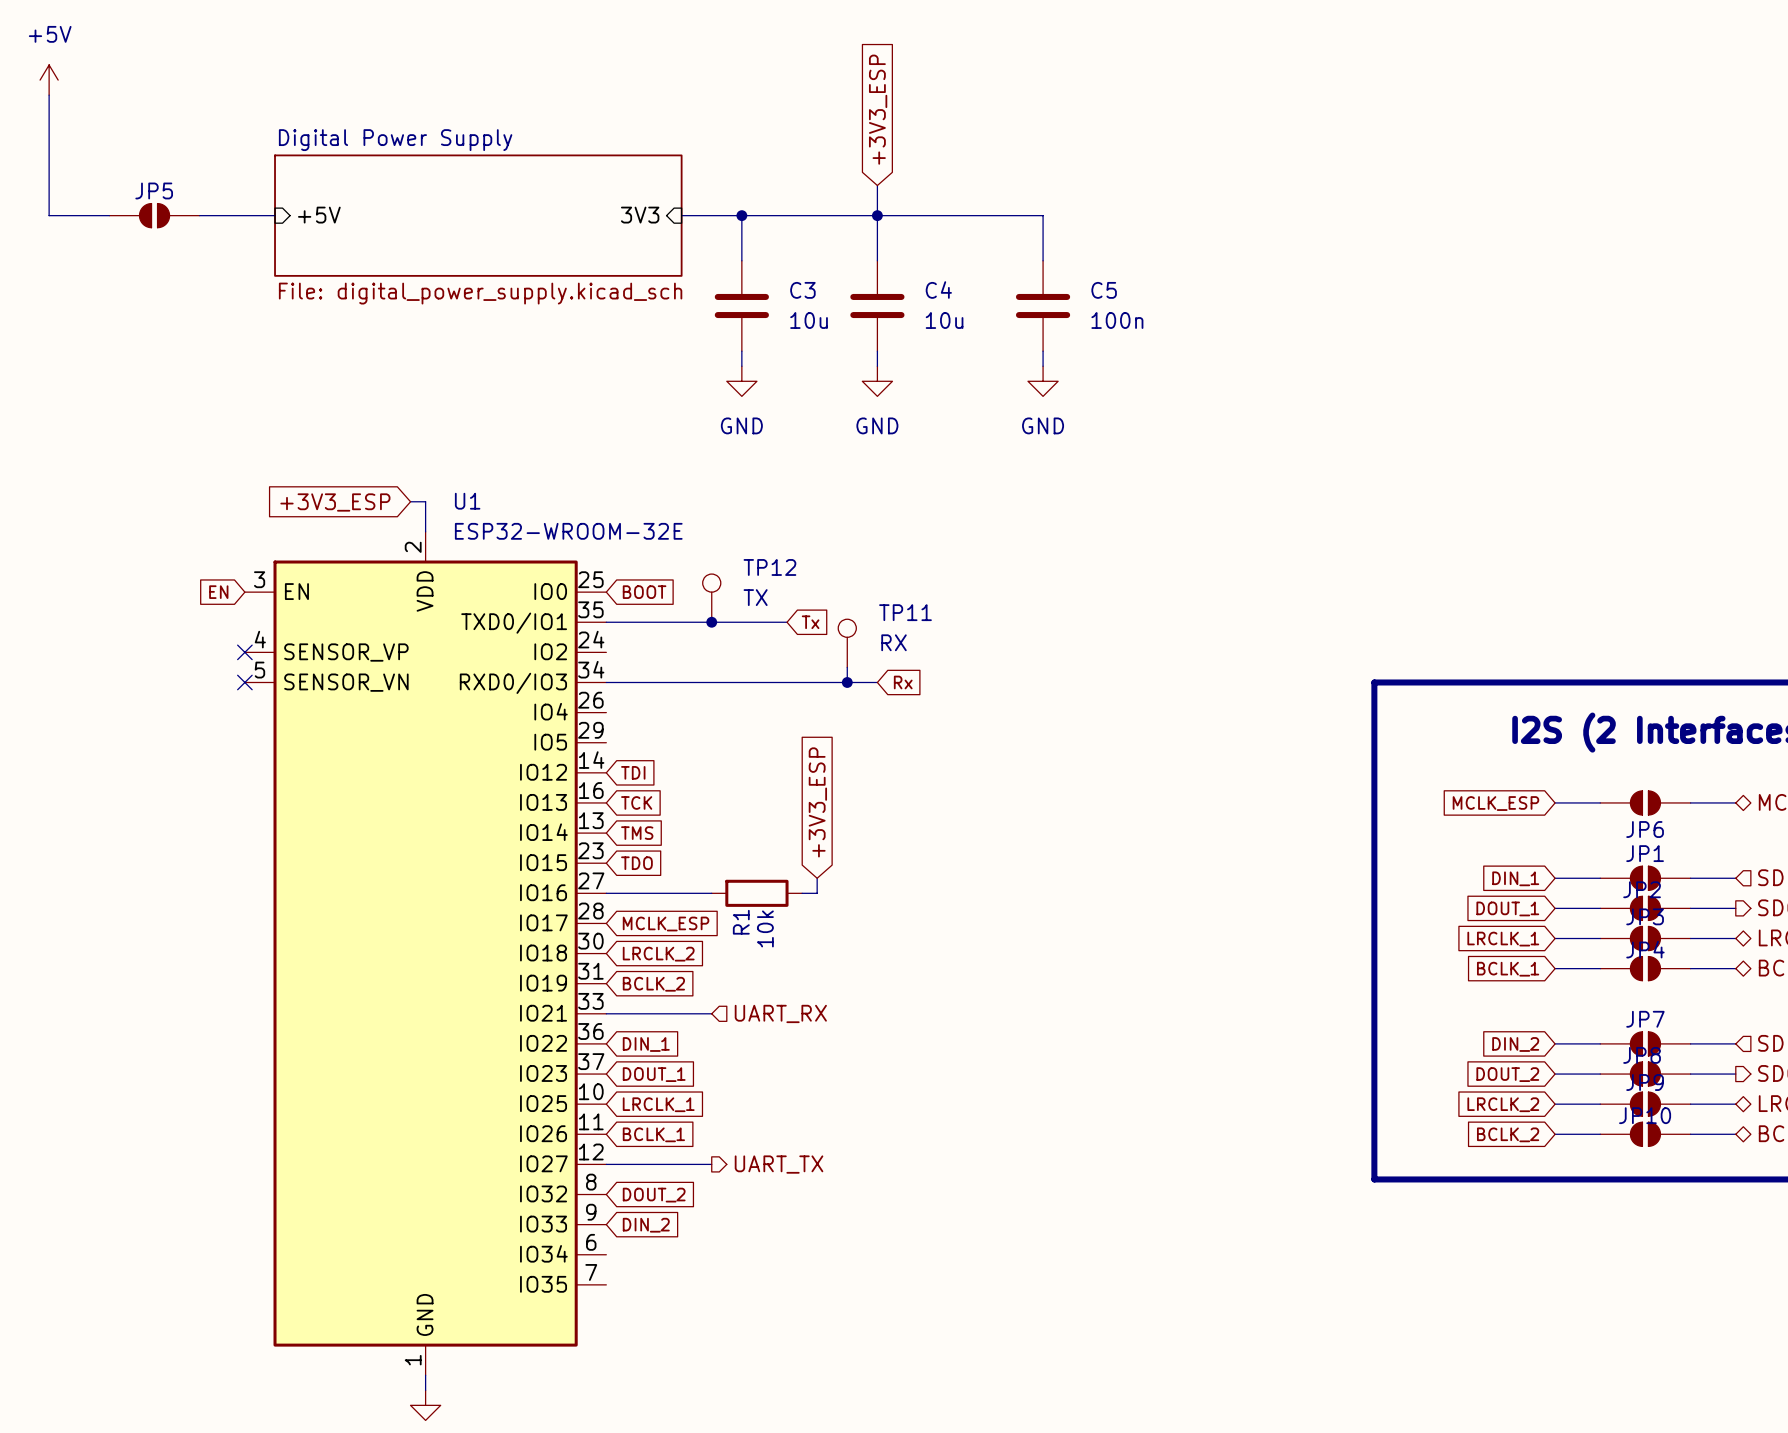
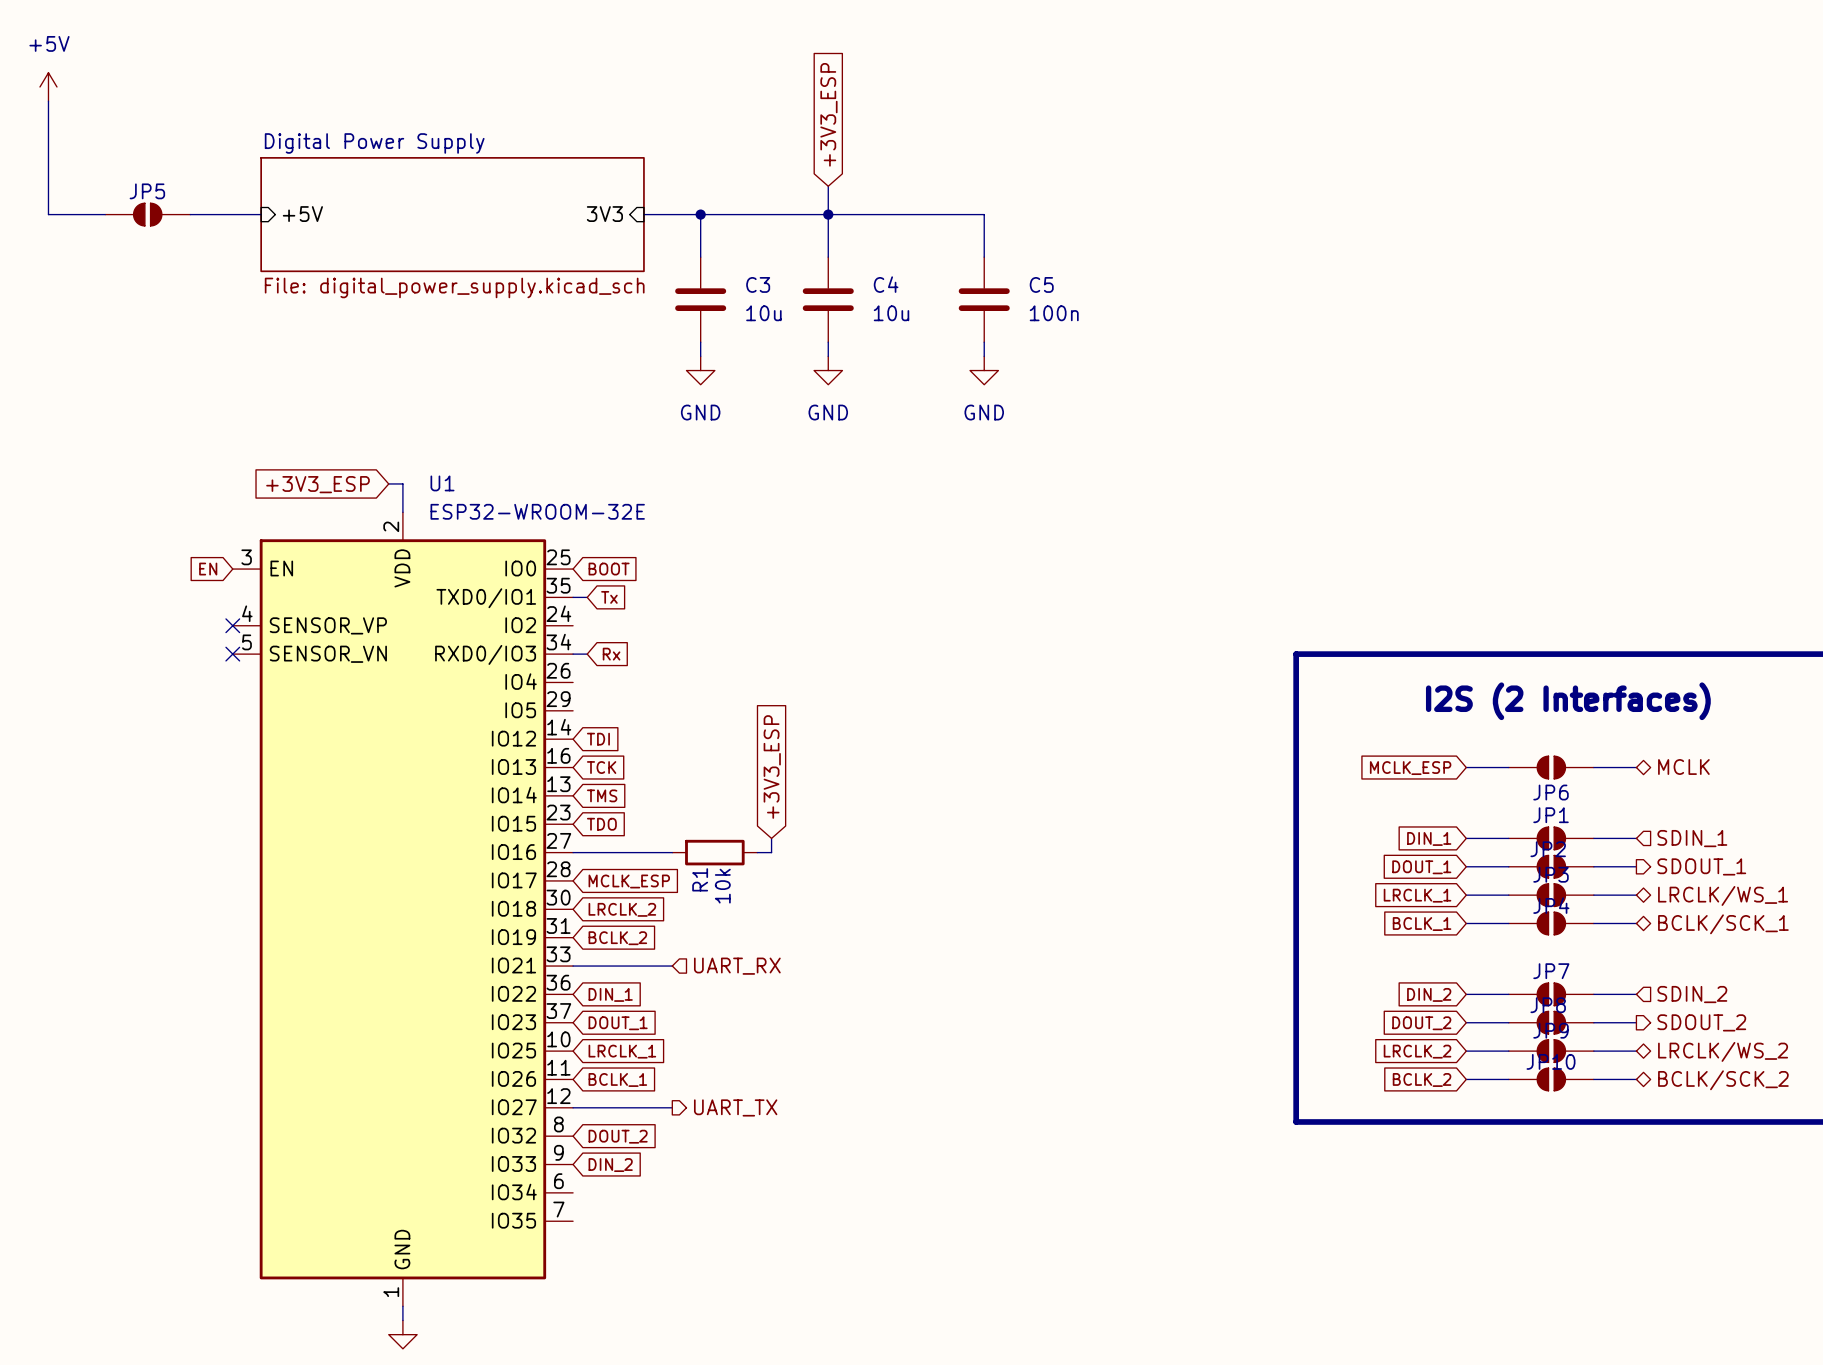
TP12: TX (711, 598) -> none
wire: (621, 622) (787, 622) -> none
junction: (711, 622) -> none
global label position: Tx (810, 622) -> Tx (609, 597)
TP11: RX (847, 643) -> none
wire: (847, 667) (847, 682) -> none
wire: (621, 682) (877, 682) -> none
junction: (847, 682) -> none
global label position: Rx (903, 682) -> Rx (611, 654)

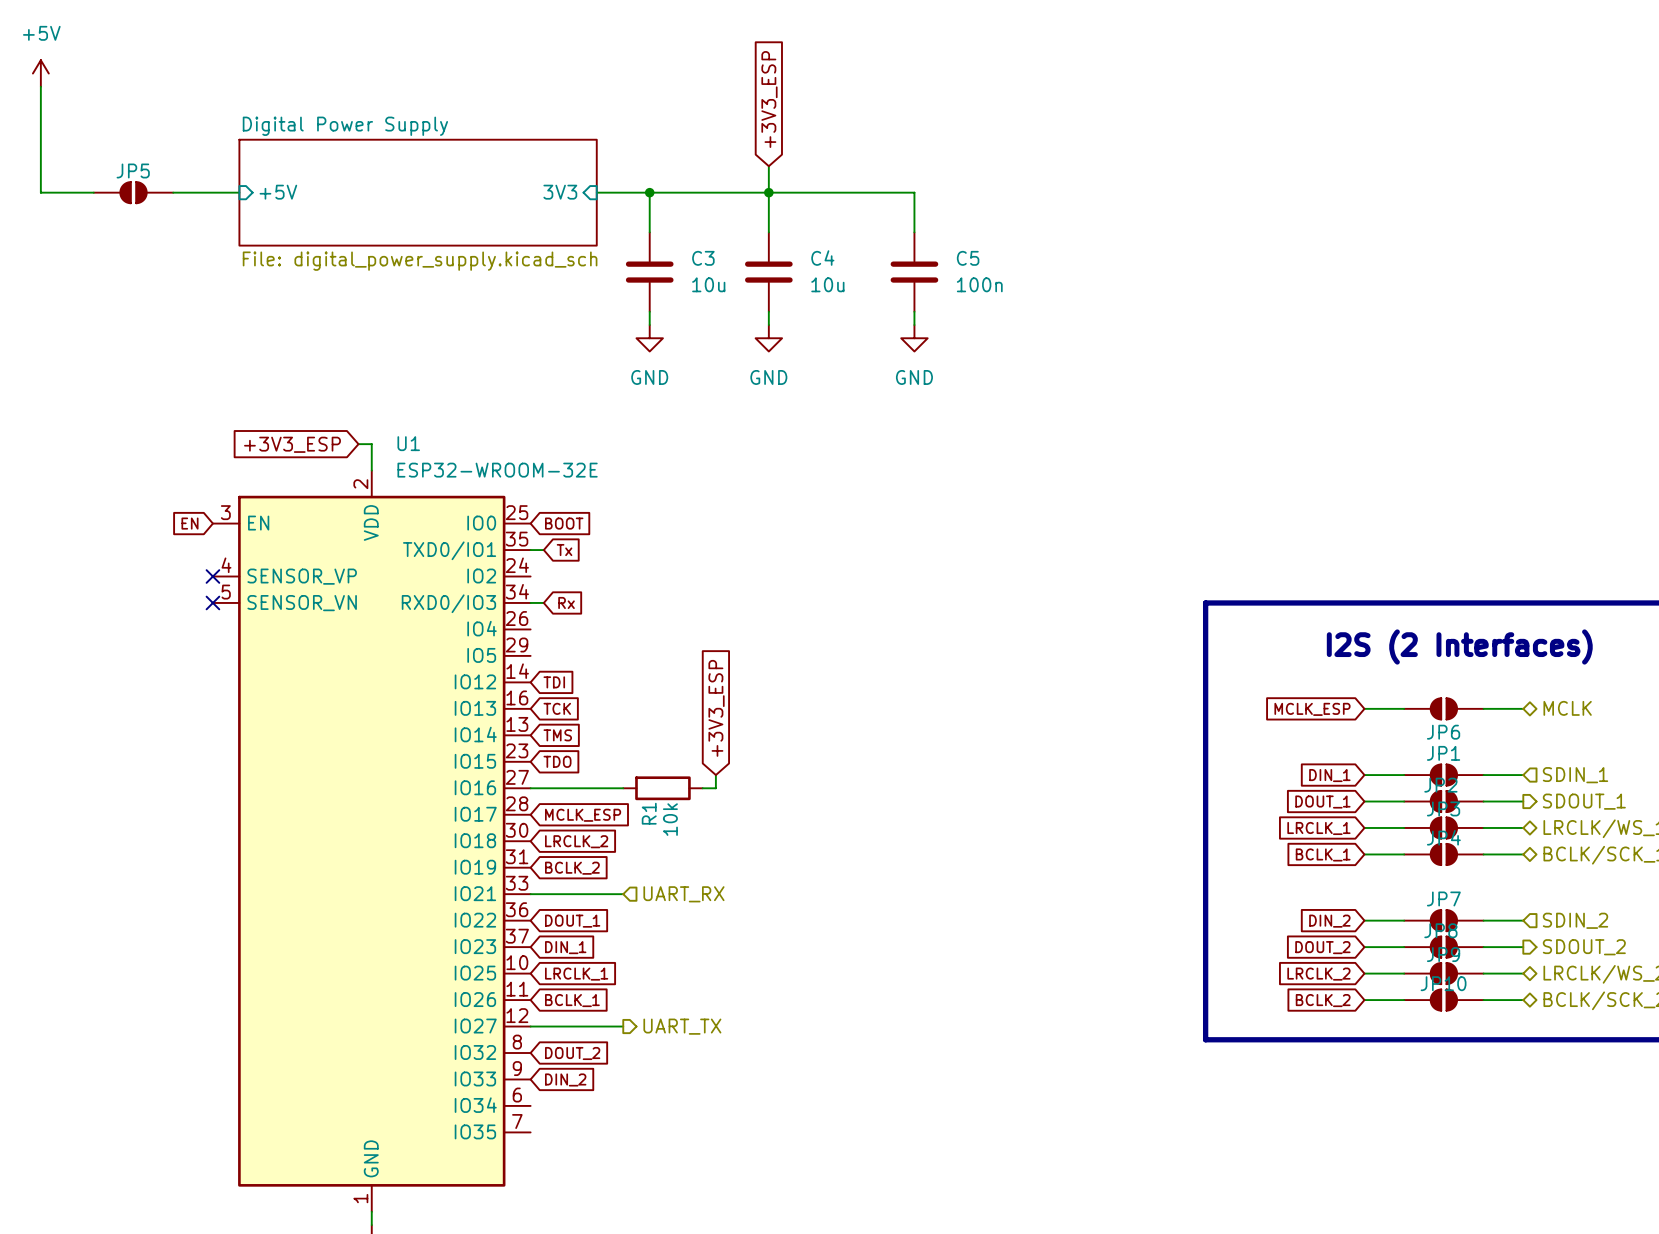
global label: DIN_1 (610, 994) -> DOUT_1 (572, 921)
global label: DOUT_1 (618, 1023) -> DIN_1 (565, 947)

